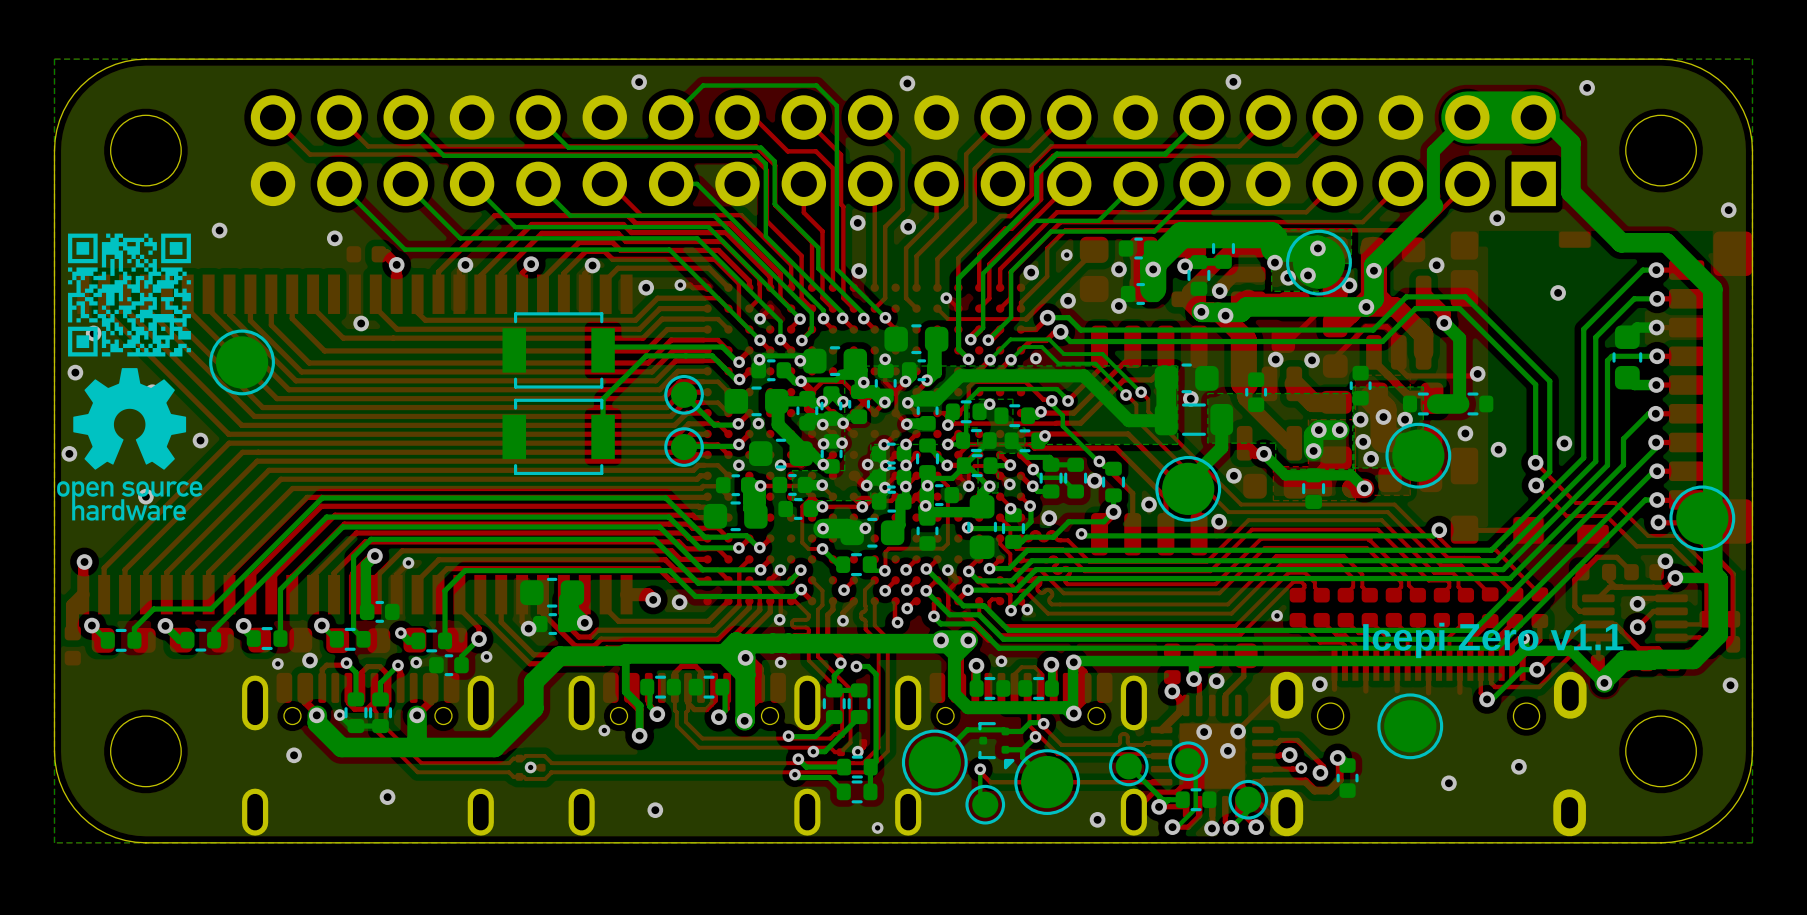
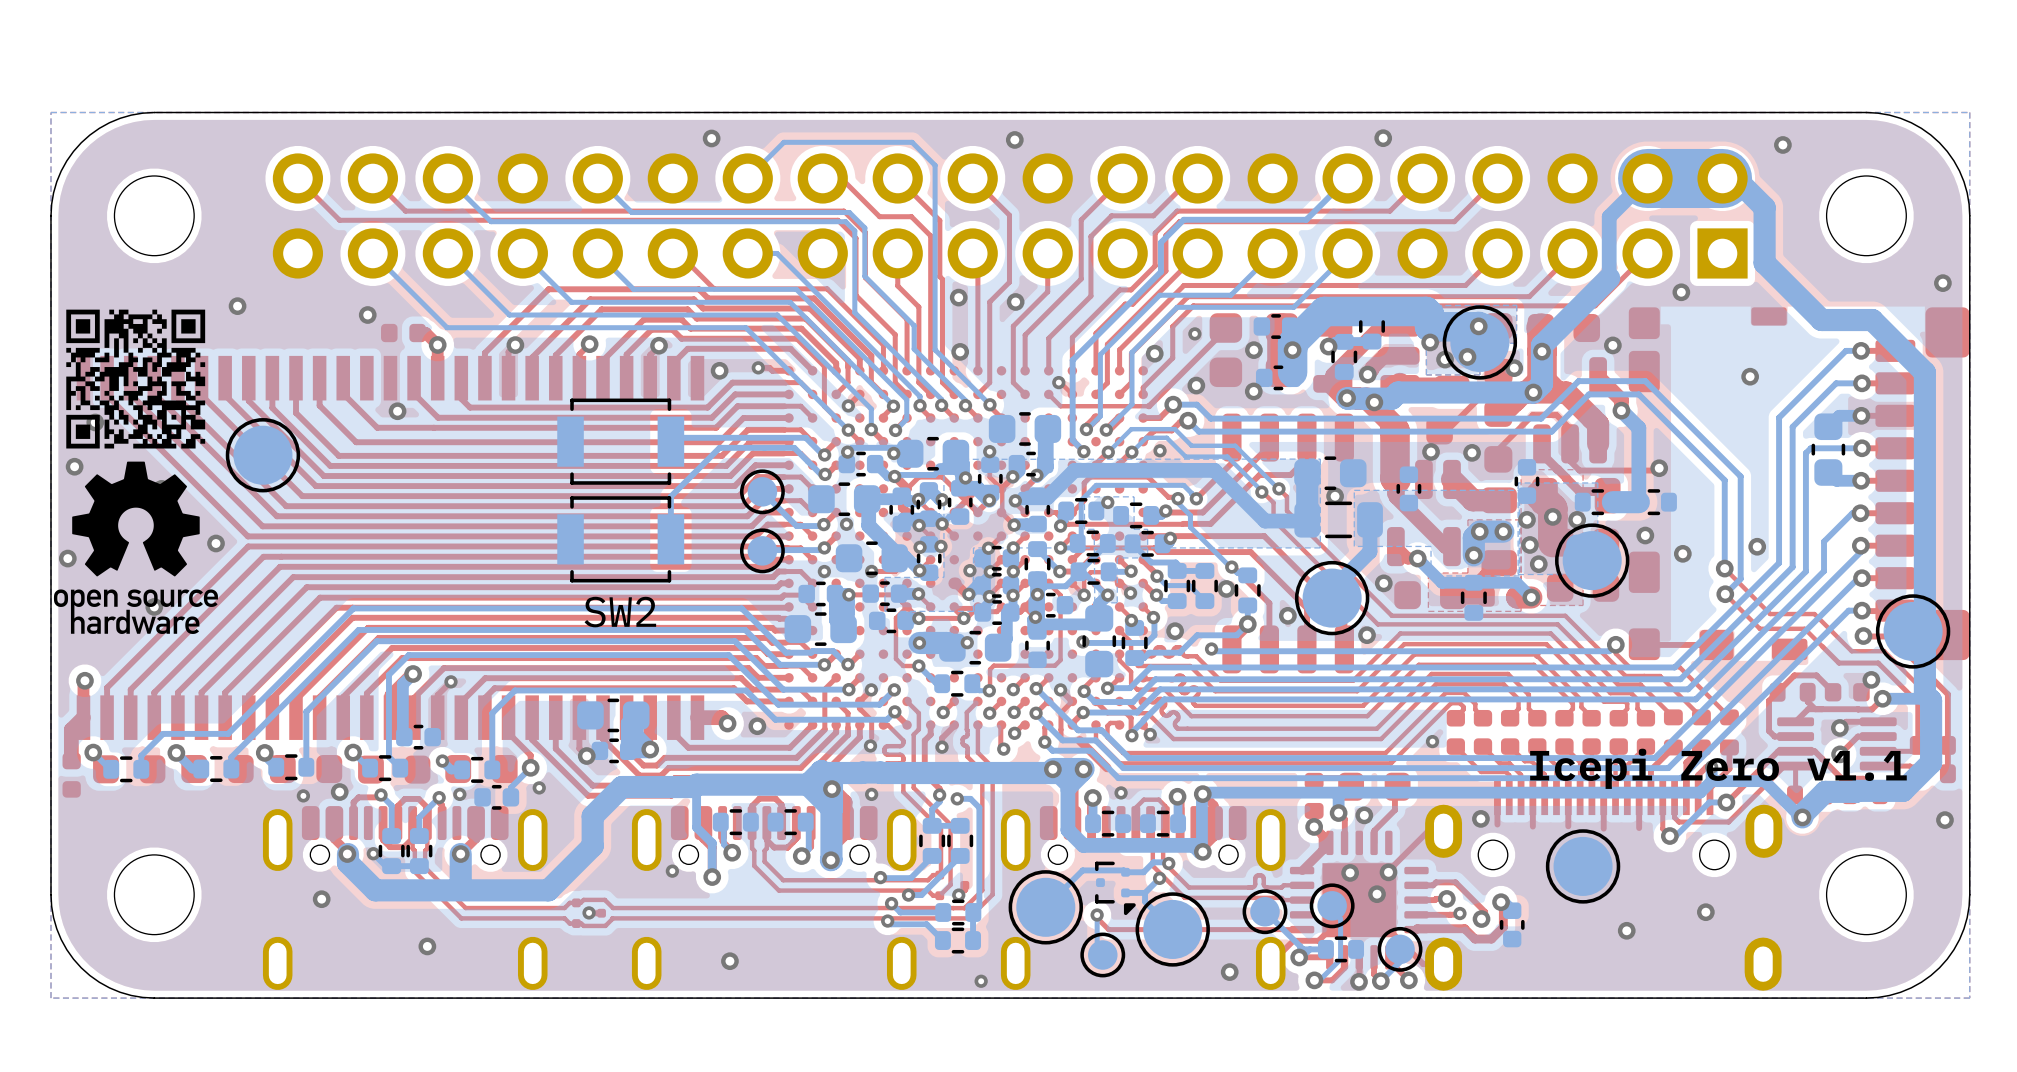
SW2 name: none -> SW2 (620, 612)

